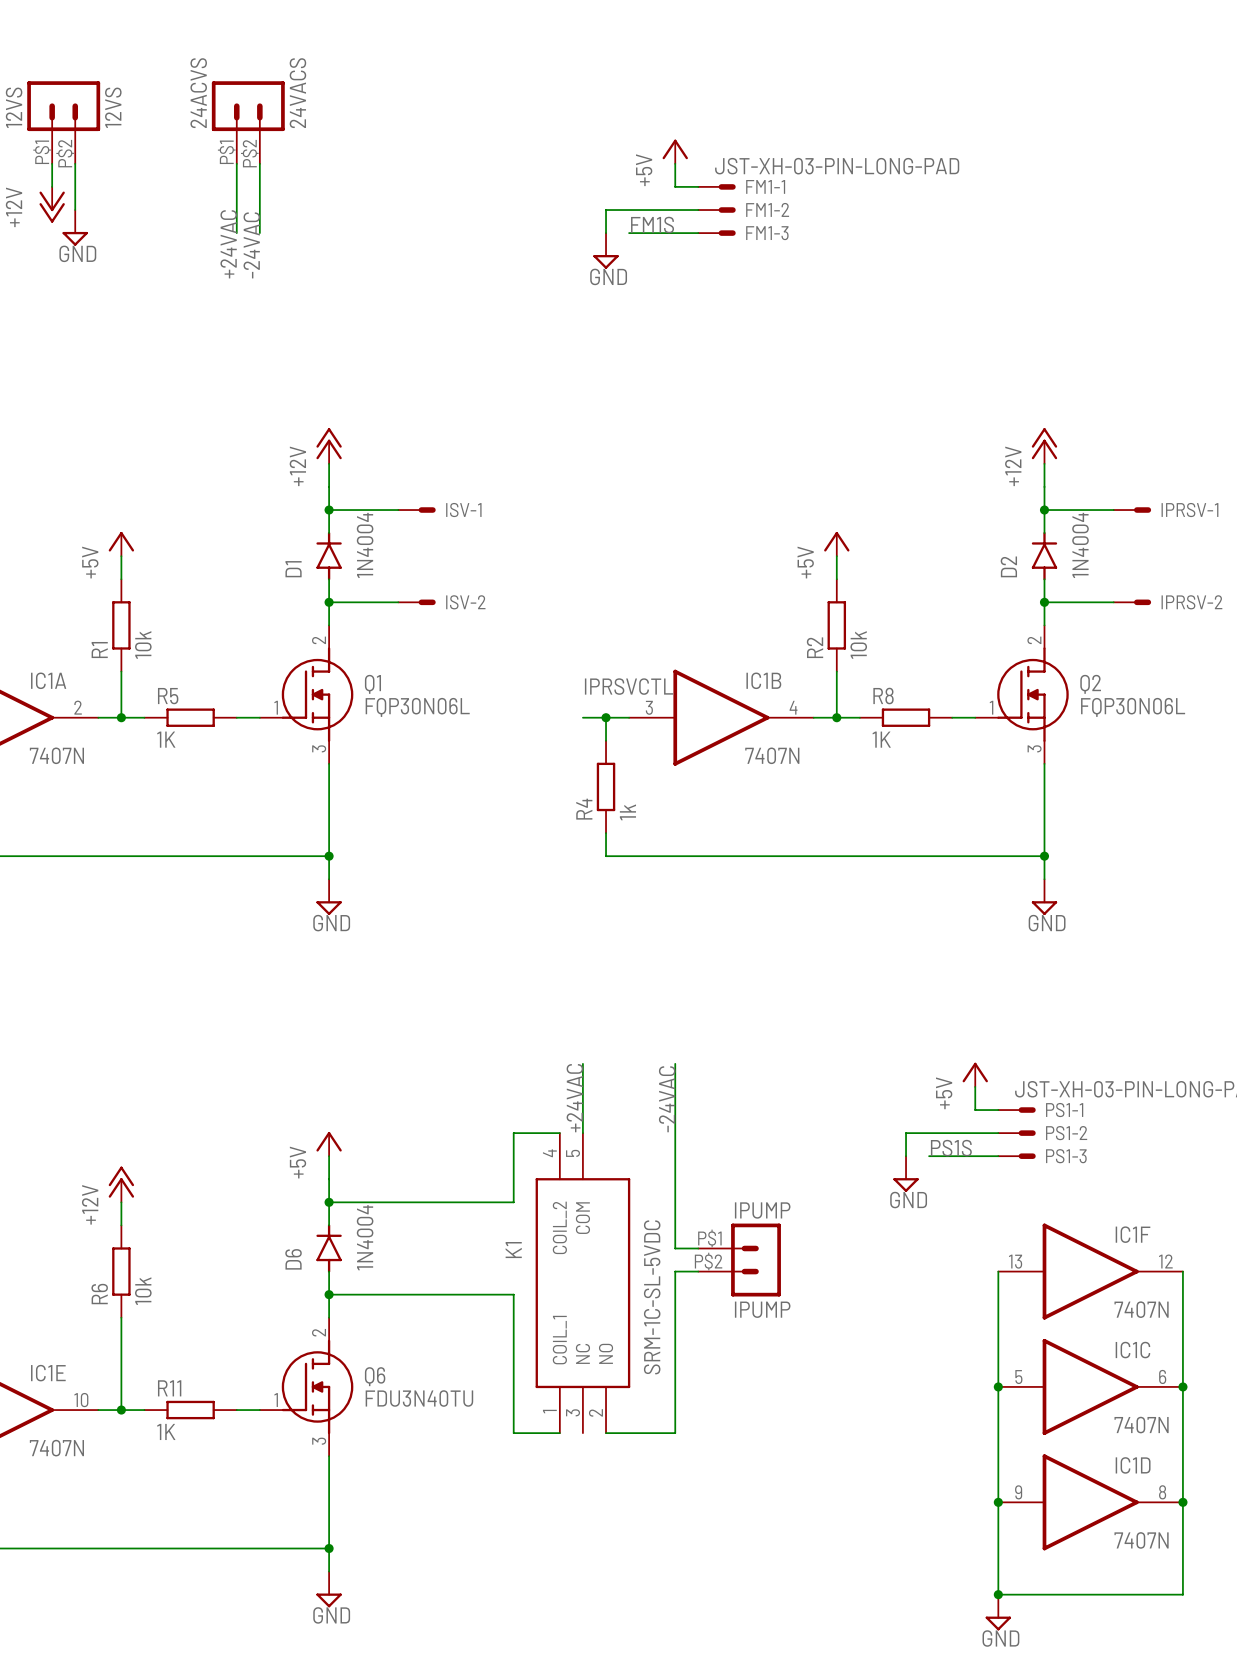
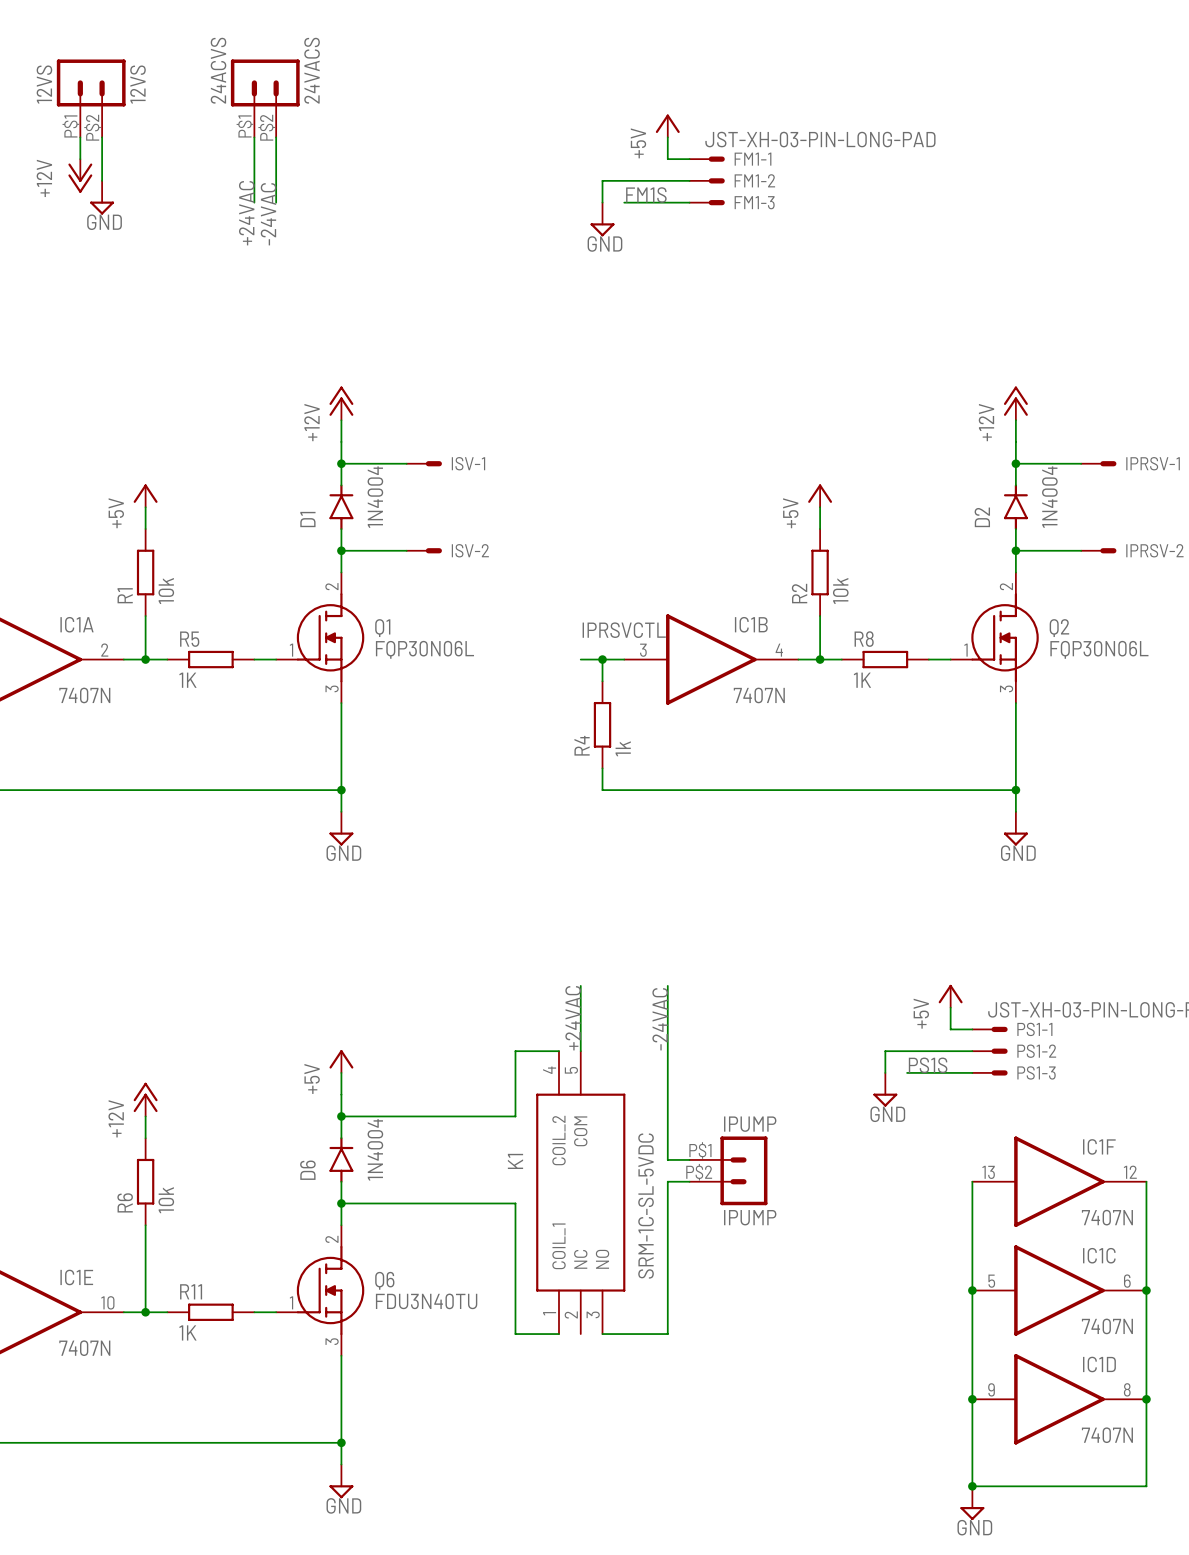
K1 pin number: 3 (573, 1412) -> 2 (571, 1314)
K1 pin number: 2 (595, 1412) -> 3 (593, 1314)

